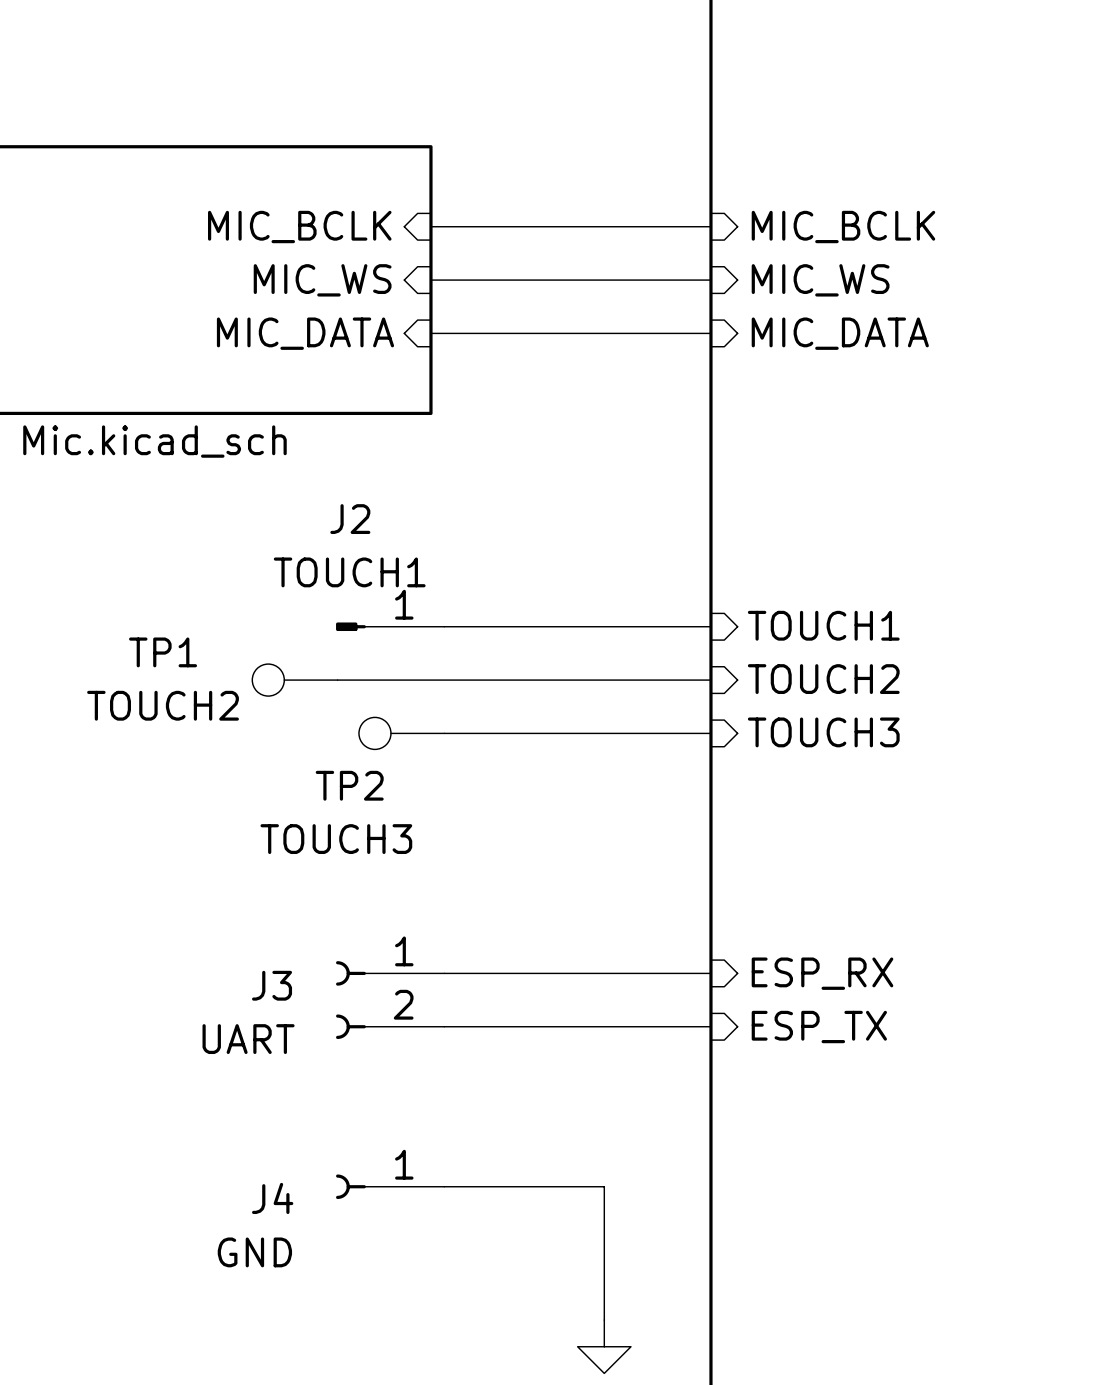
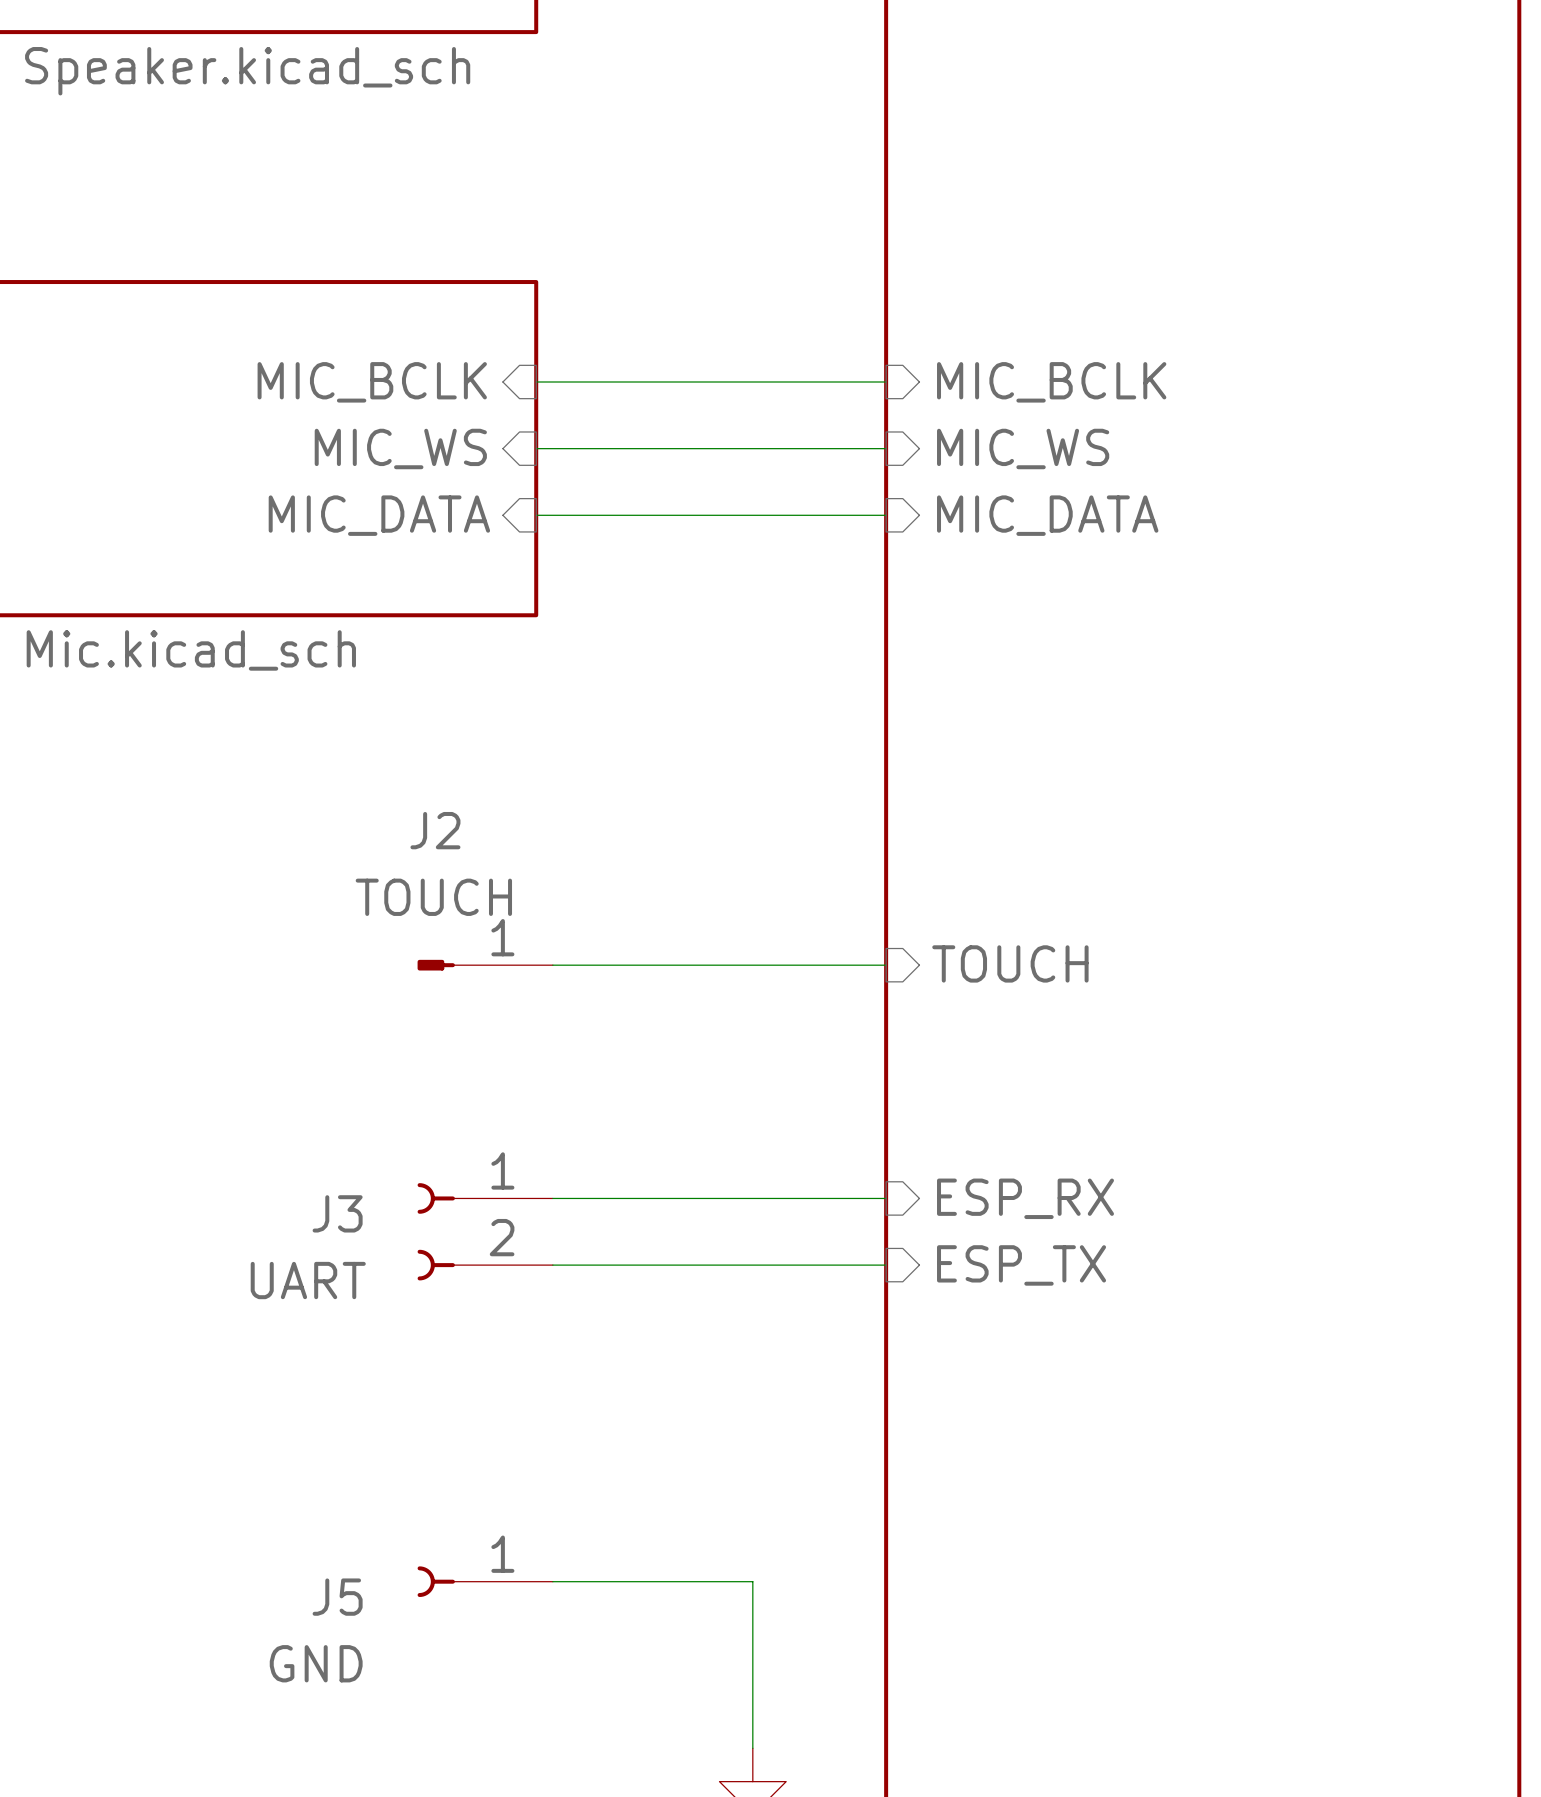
J2 value: TOUCH1 (349, 572) -> TOUCH (433, 897)
sheet pin: TOUCH1 (823, 625) -> none
J2 position: (390, 626) -> (485, 965)
wire: (444, 626) (710, 626) -> none
sheet pin: TOUCH2 (823, 679) -> TOUCH (1010, 963)
TP1: TOUCH2 (294, 680) -> none
wire: (337, 680) (710, 680) -> none
sheet pin: TOUCH3 (823, 732) -> none
TP2: TOUCH3 (401, 733) -> none
wire: (444, 733) (710, 733) -> (552, 965) (886, 965)
wire: (444, 973) (710, 973) -> (552, 1265) (886, 1265)
sheet pin position: ESP_RX (822, 973) -> ESP_RX (1025, 1198)
J3 position: (390, 1000) -> (485, 1231)
wire: (444, 1026) (710, 1026) -> (552, 1198) (886, 1198)
sheet pin position: ESP_TX (819, 1027) -> ESP_TX (1021, 1265)
J4 name: J4 (272, 1198) -> J5 (337, 1597)

